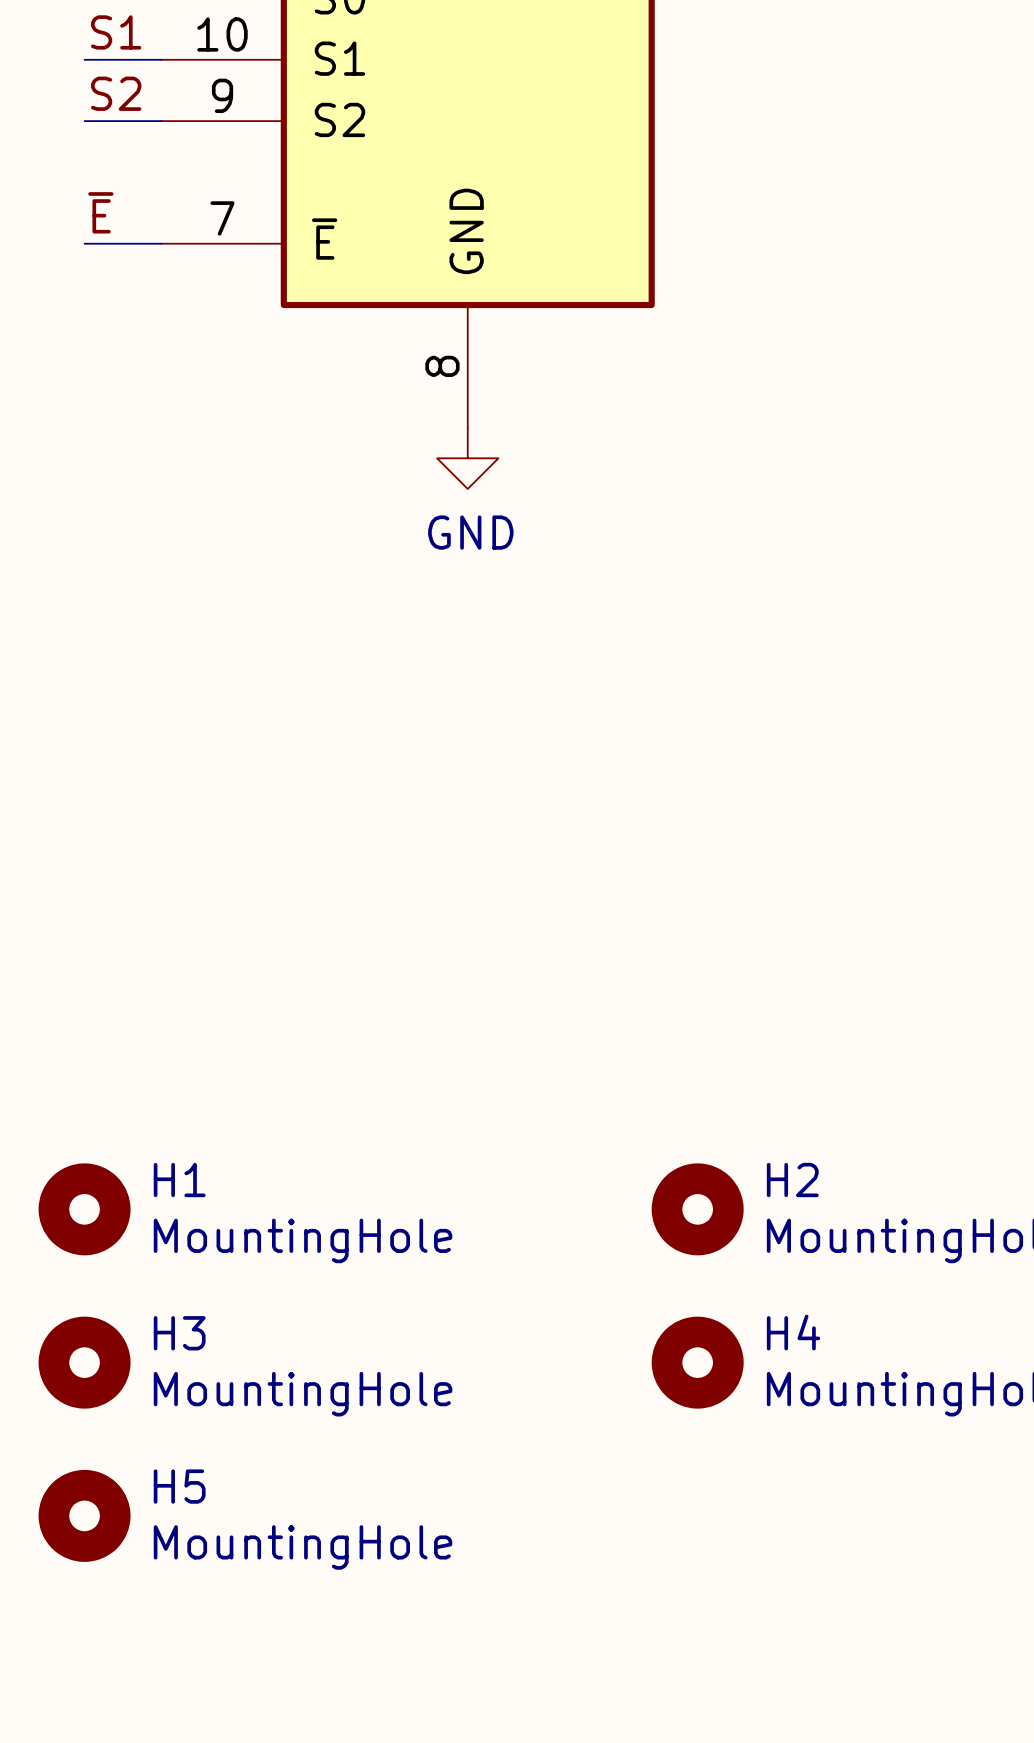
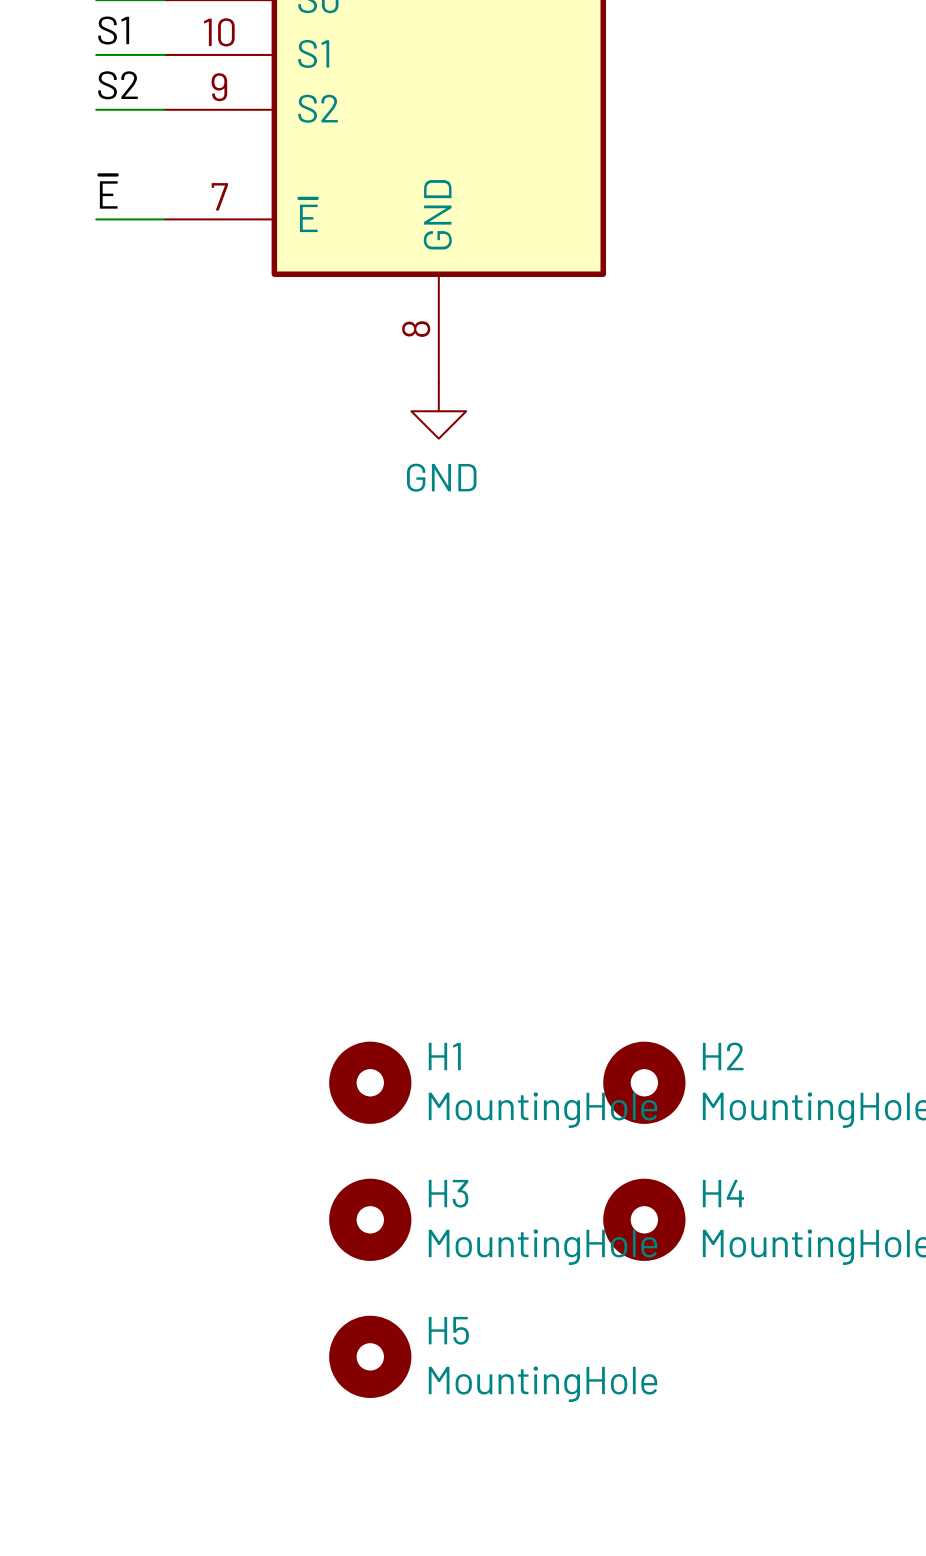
H1 position: (84, 1209) -> (370, 1082)
H3 position: (84, 1362) -> (370, 1219)
H5 position: (84, 1515) -> (370, 1356)

